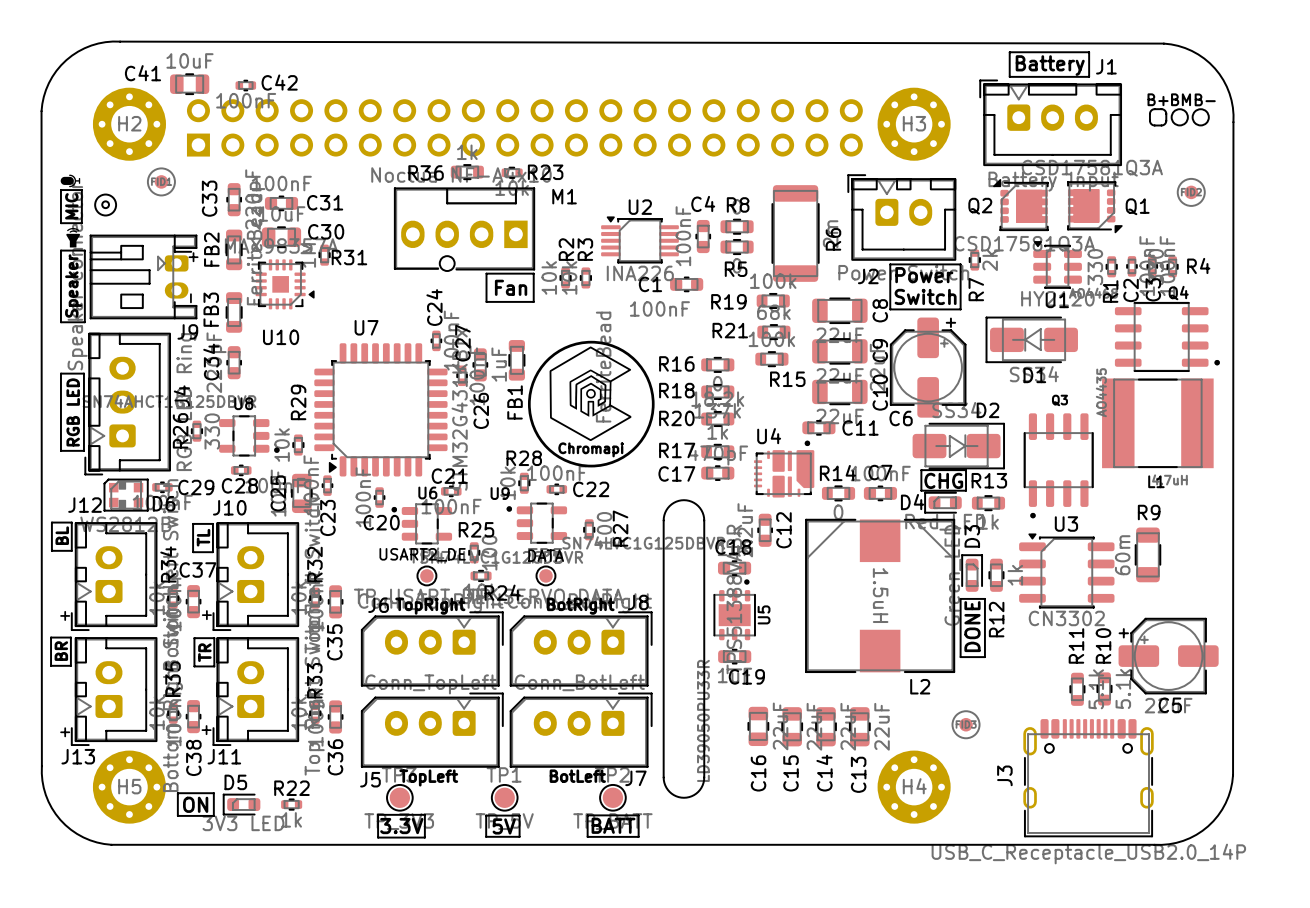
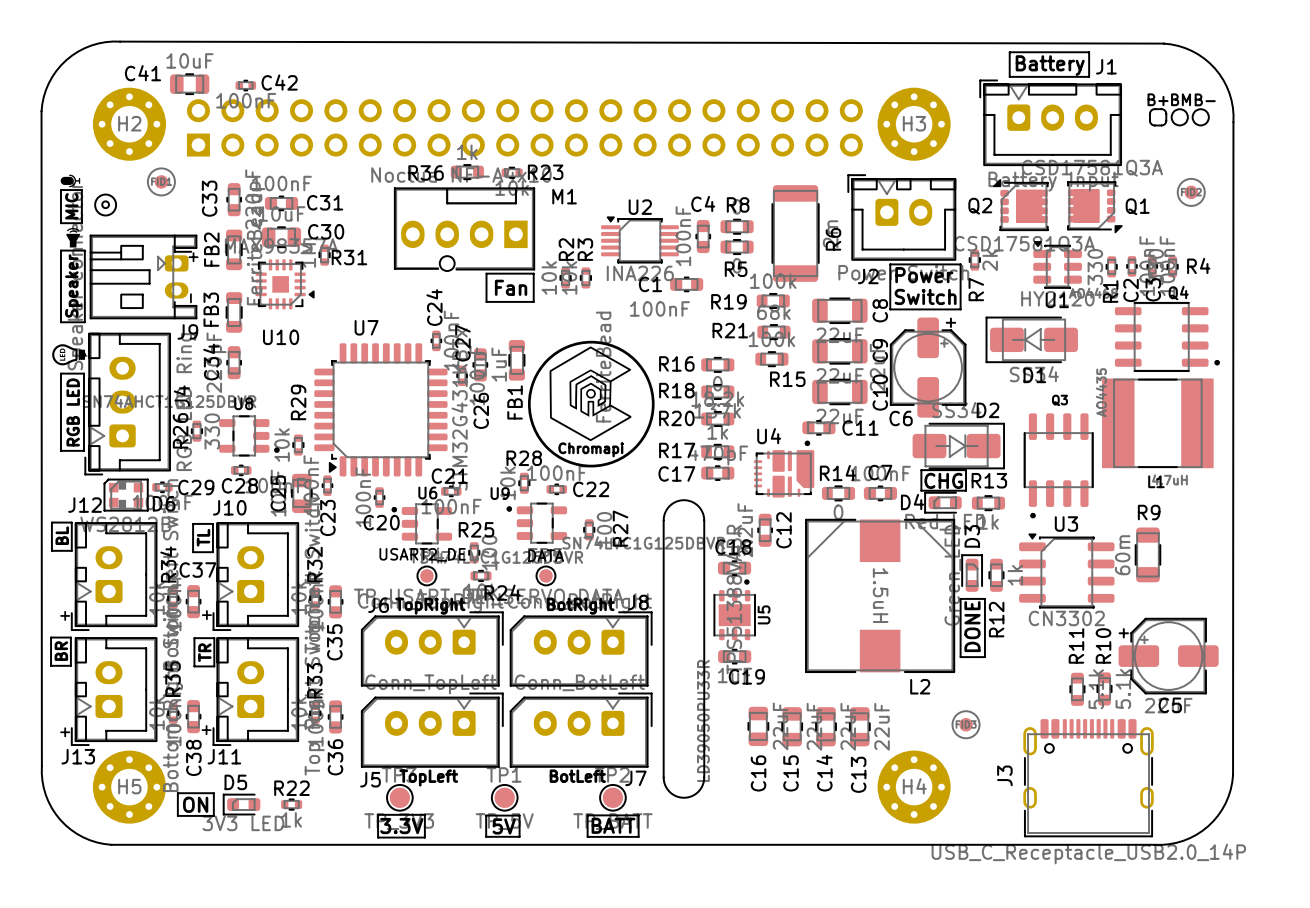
drawing: none -> [52, 344, 87, 366]

